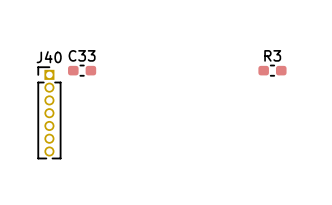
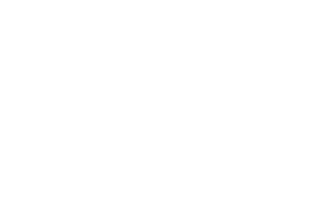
C33: (82, 70) -> none
R3: (272, 70) -> none
J40: (49, 112) -> none

